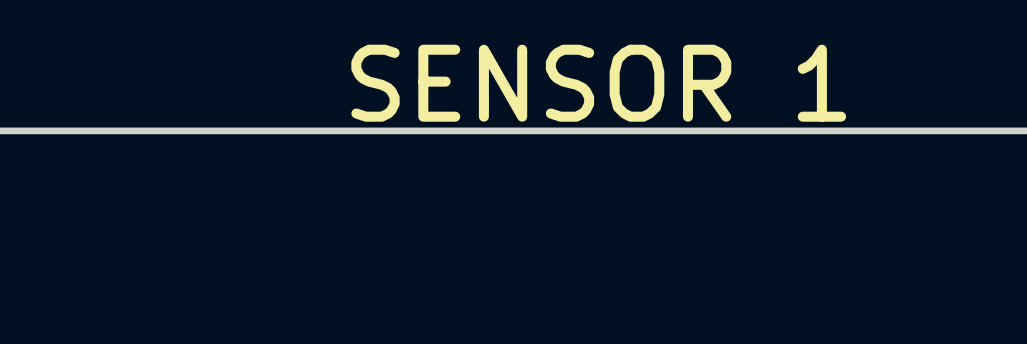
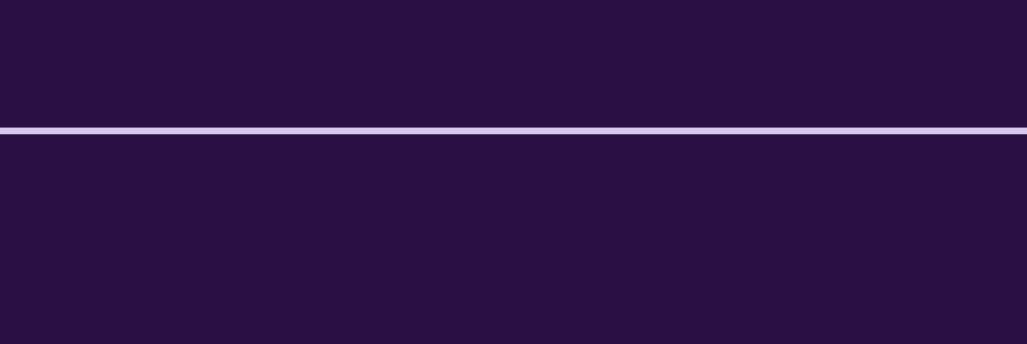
text: SENSOR 1 (598, 83) -> none

